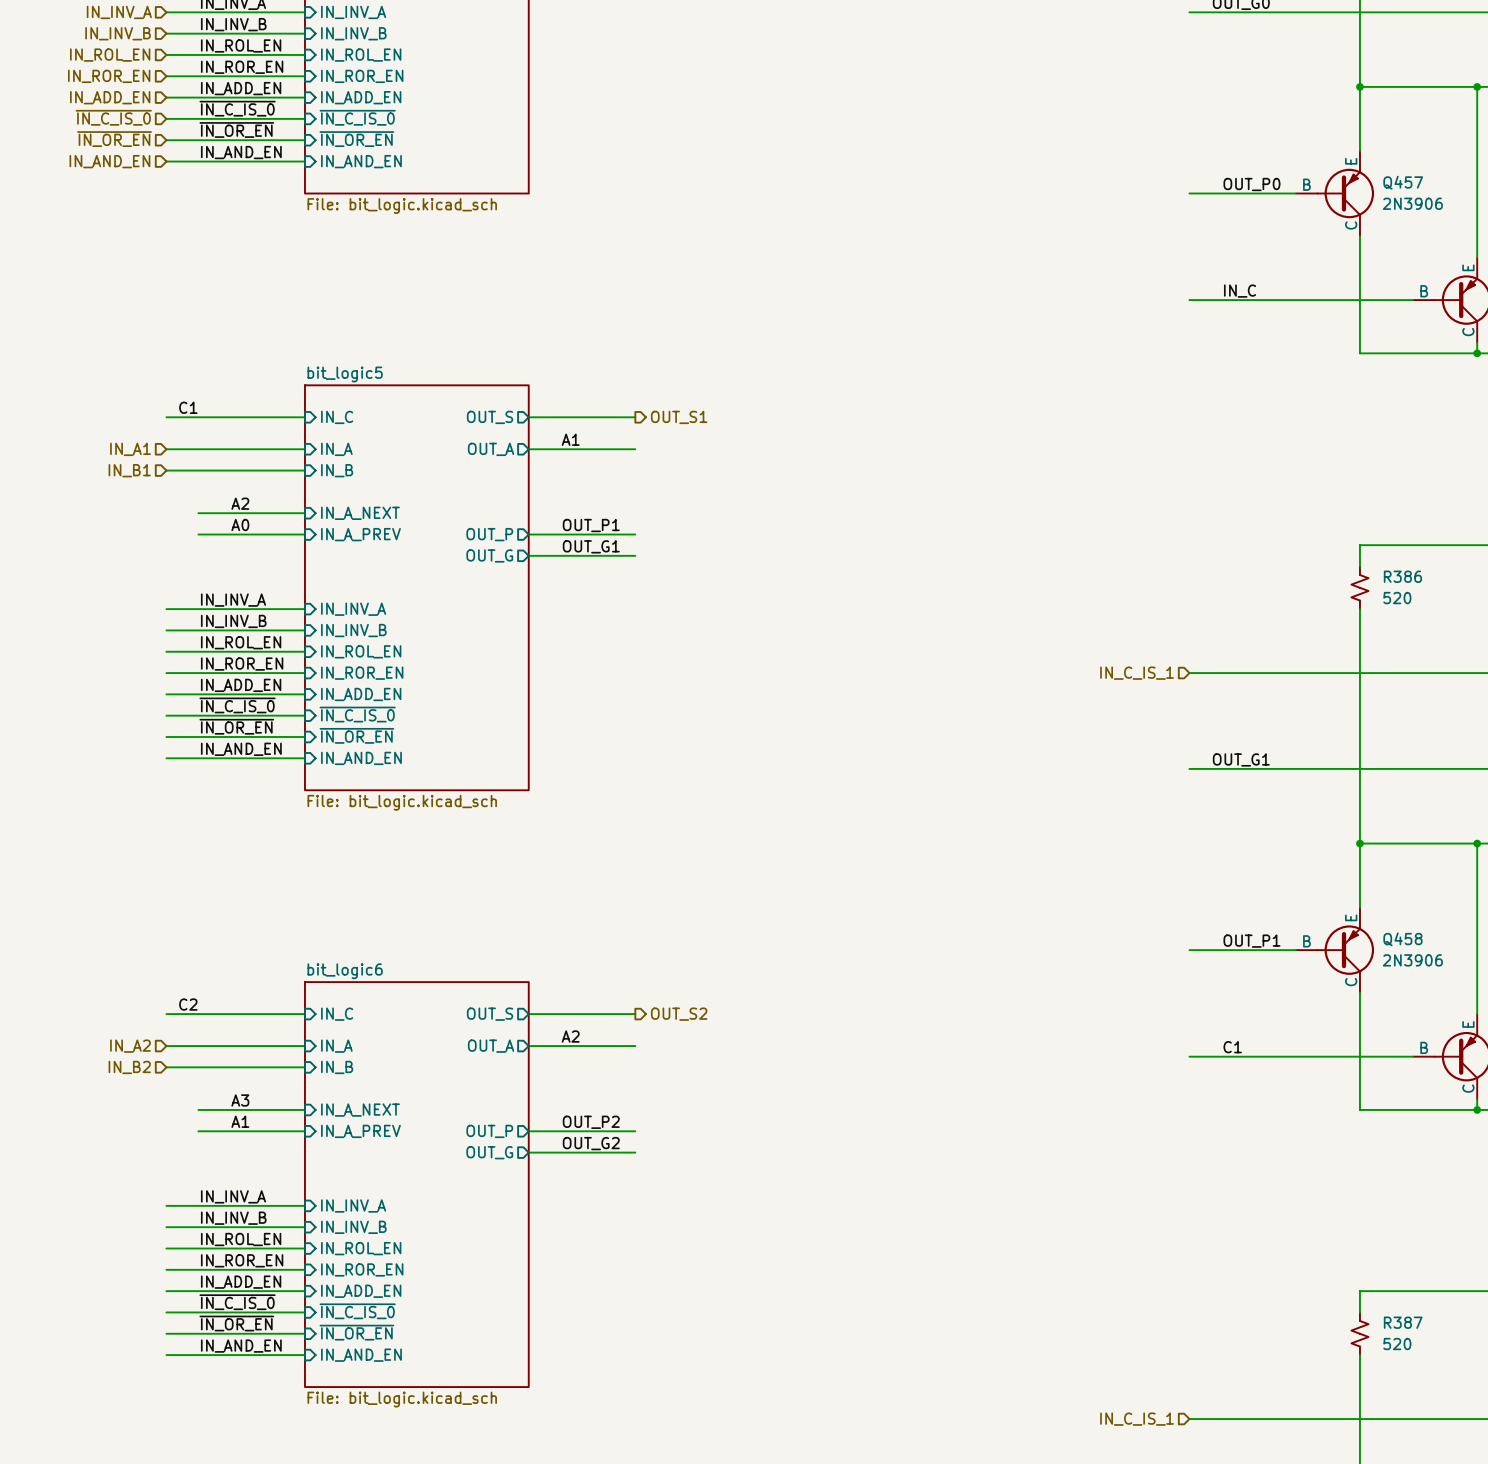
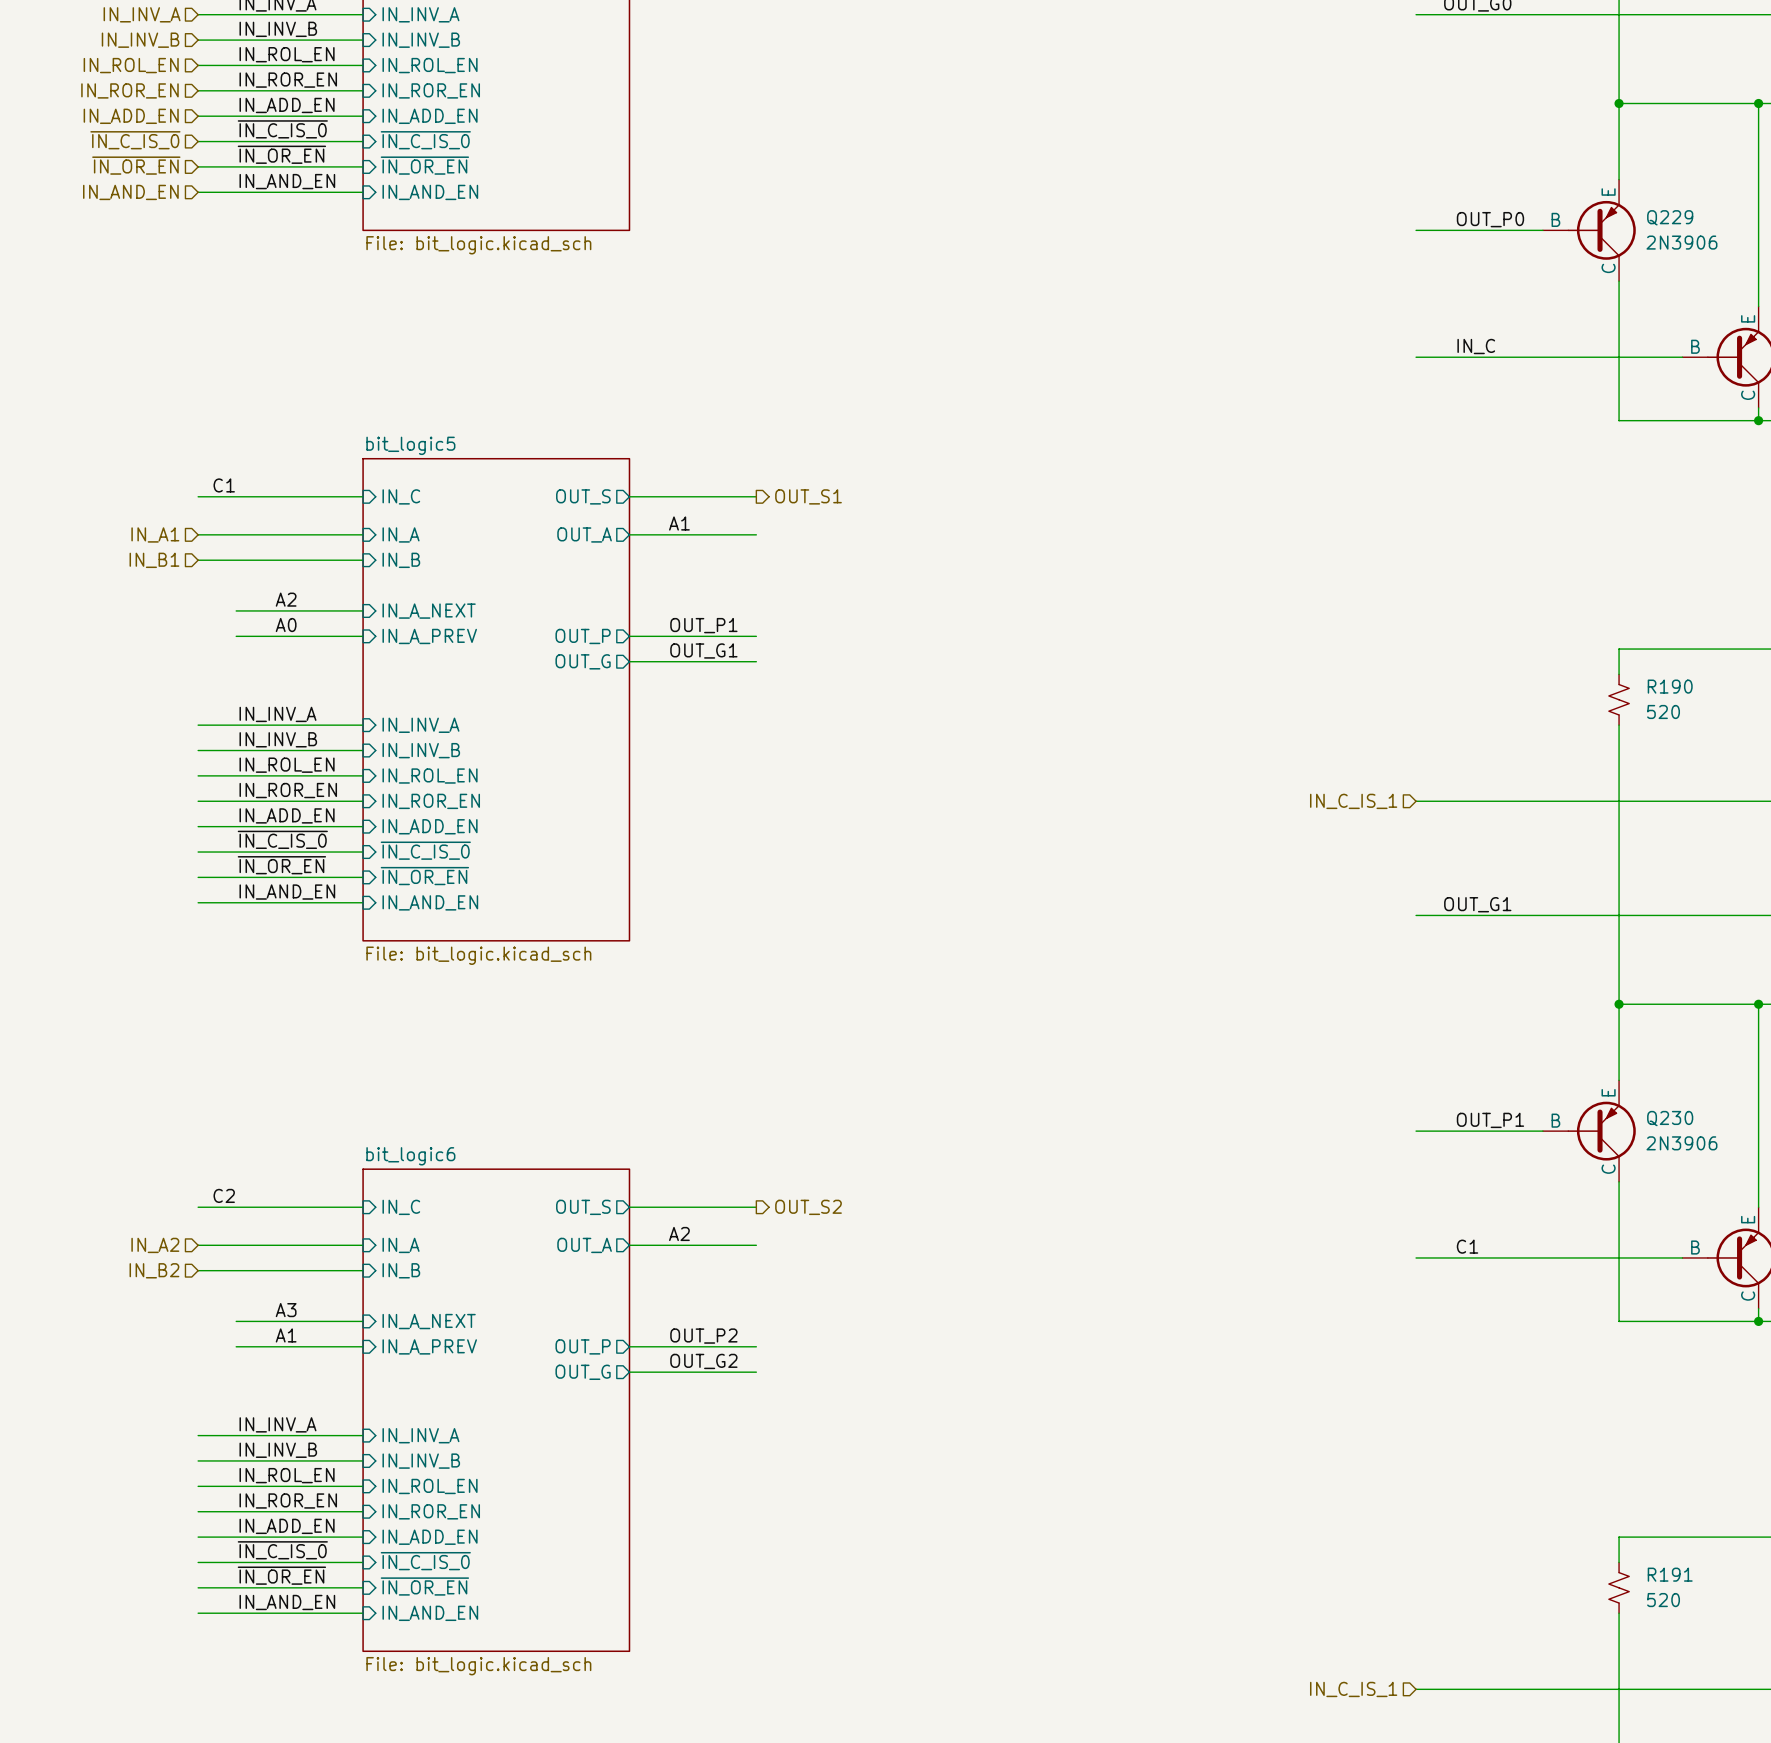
Q457 name: Q457 (1403, 182) -> Q229 (1670, 217)
R386 name: R386 (1402, 576) -> R190 (1670, 686)
Q458 name: Q458 (1402, 939) -> Q230 (1670, 1118)
R387 name: R387 (1403, 1322) -> R191 (1670, 1574)

